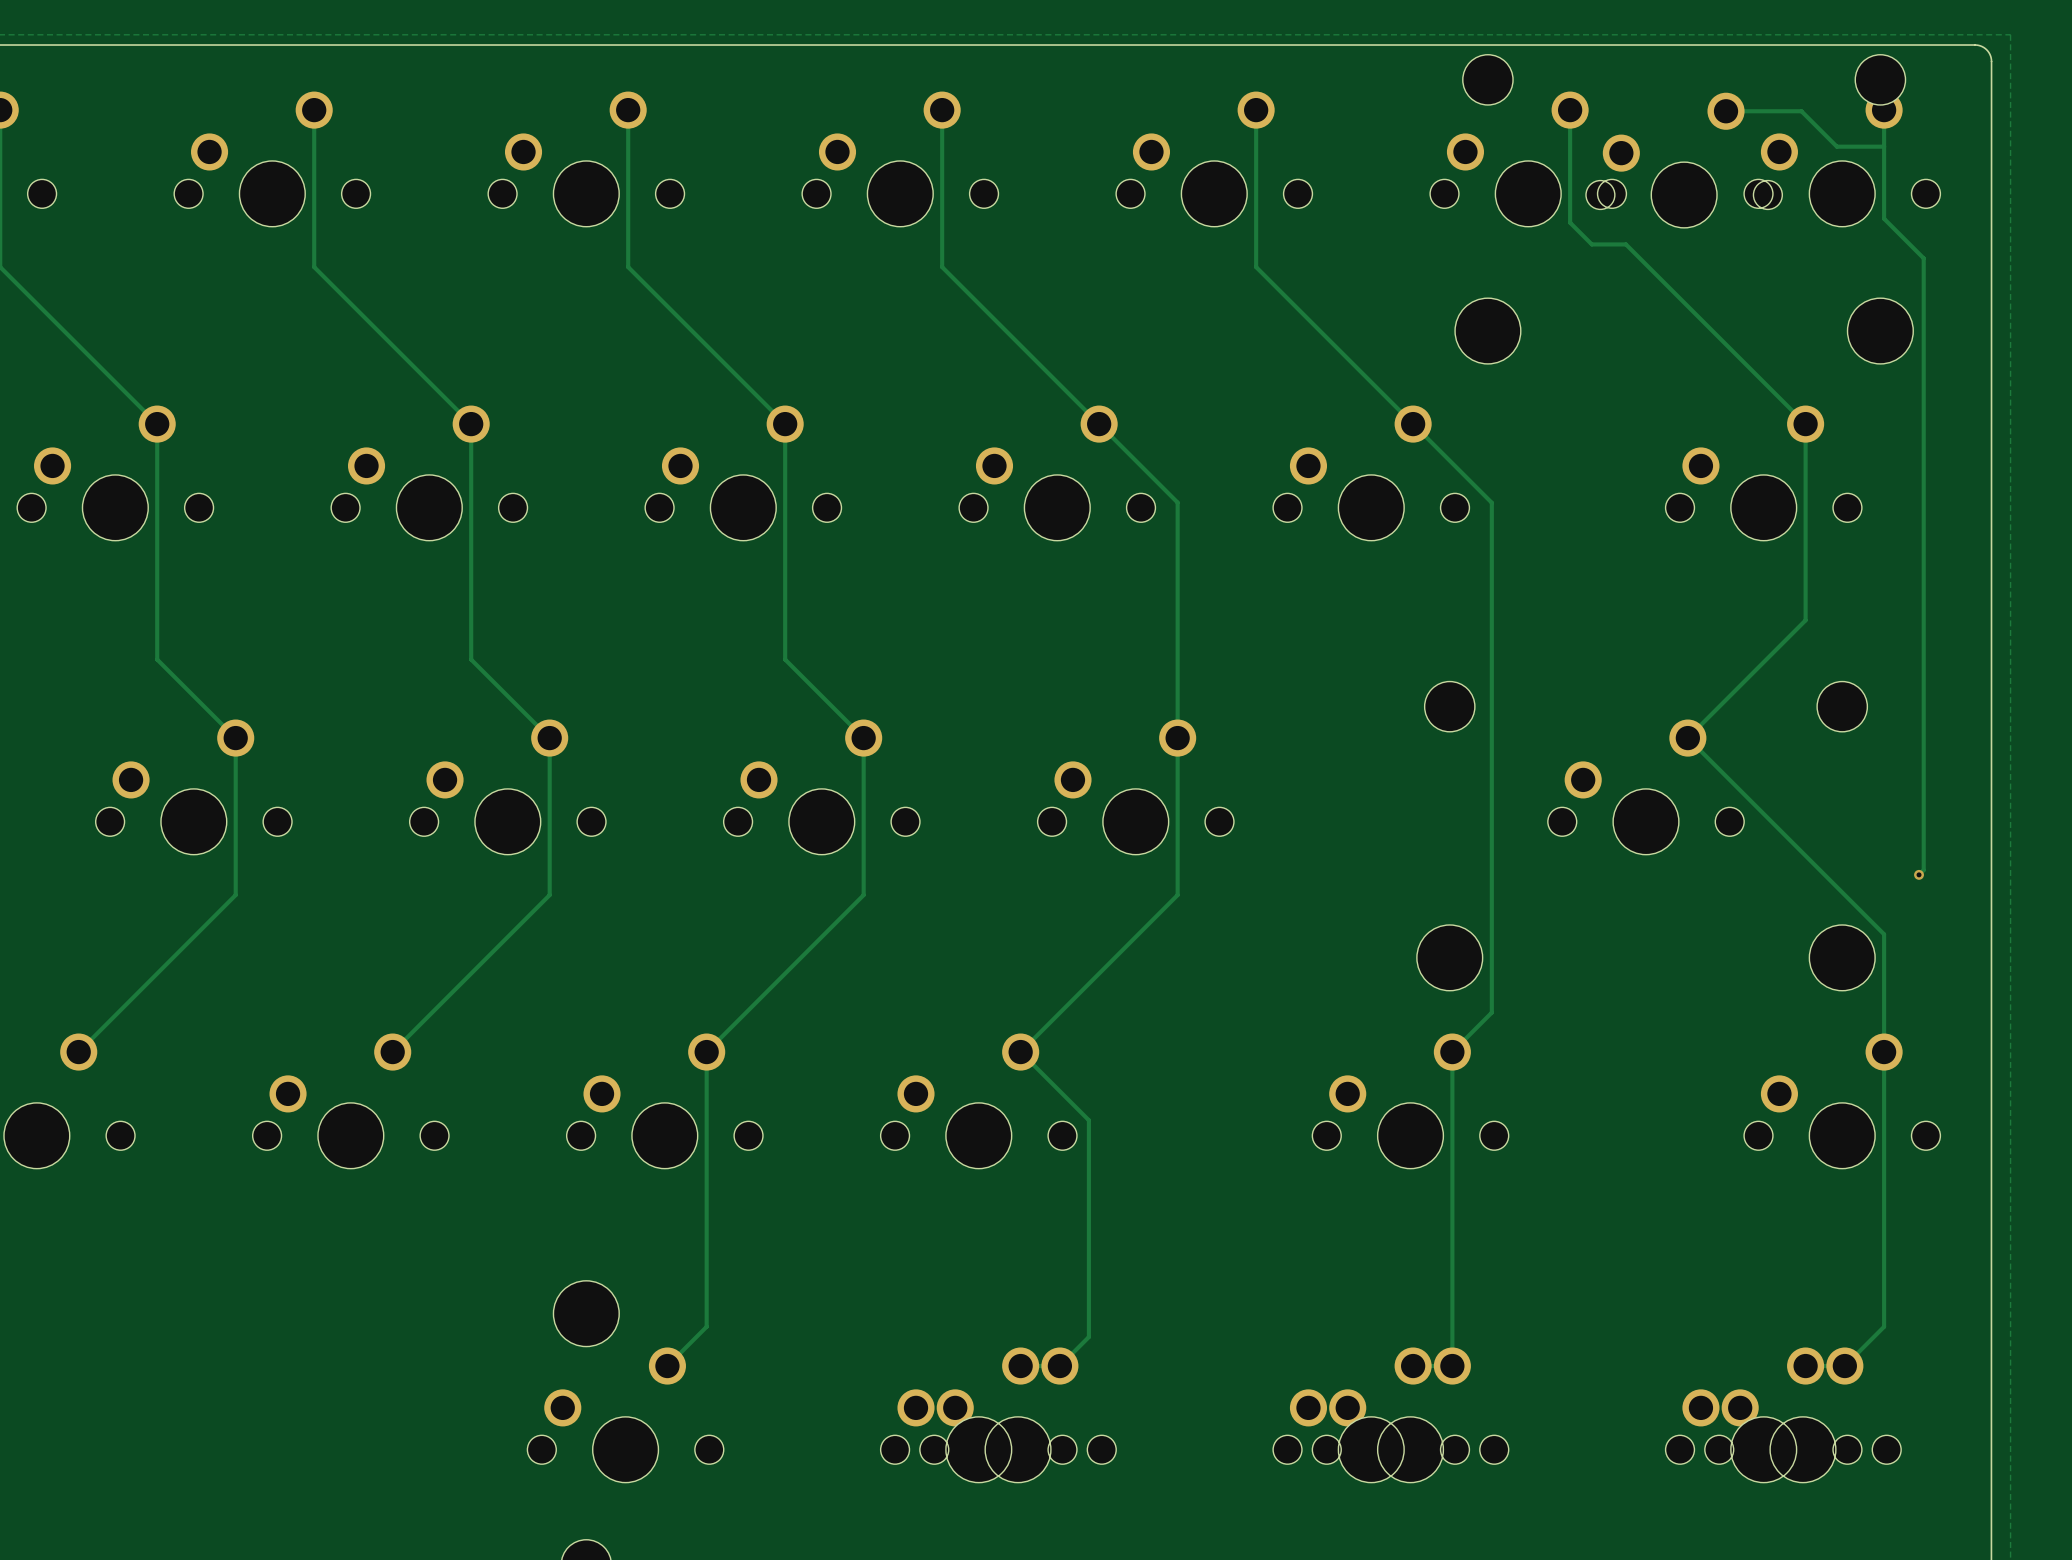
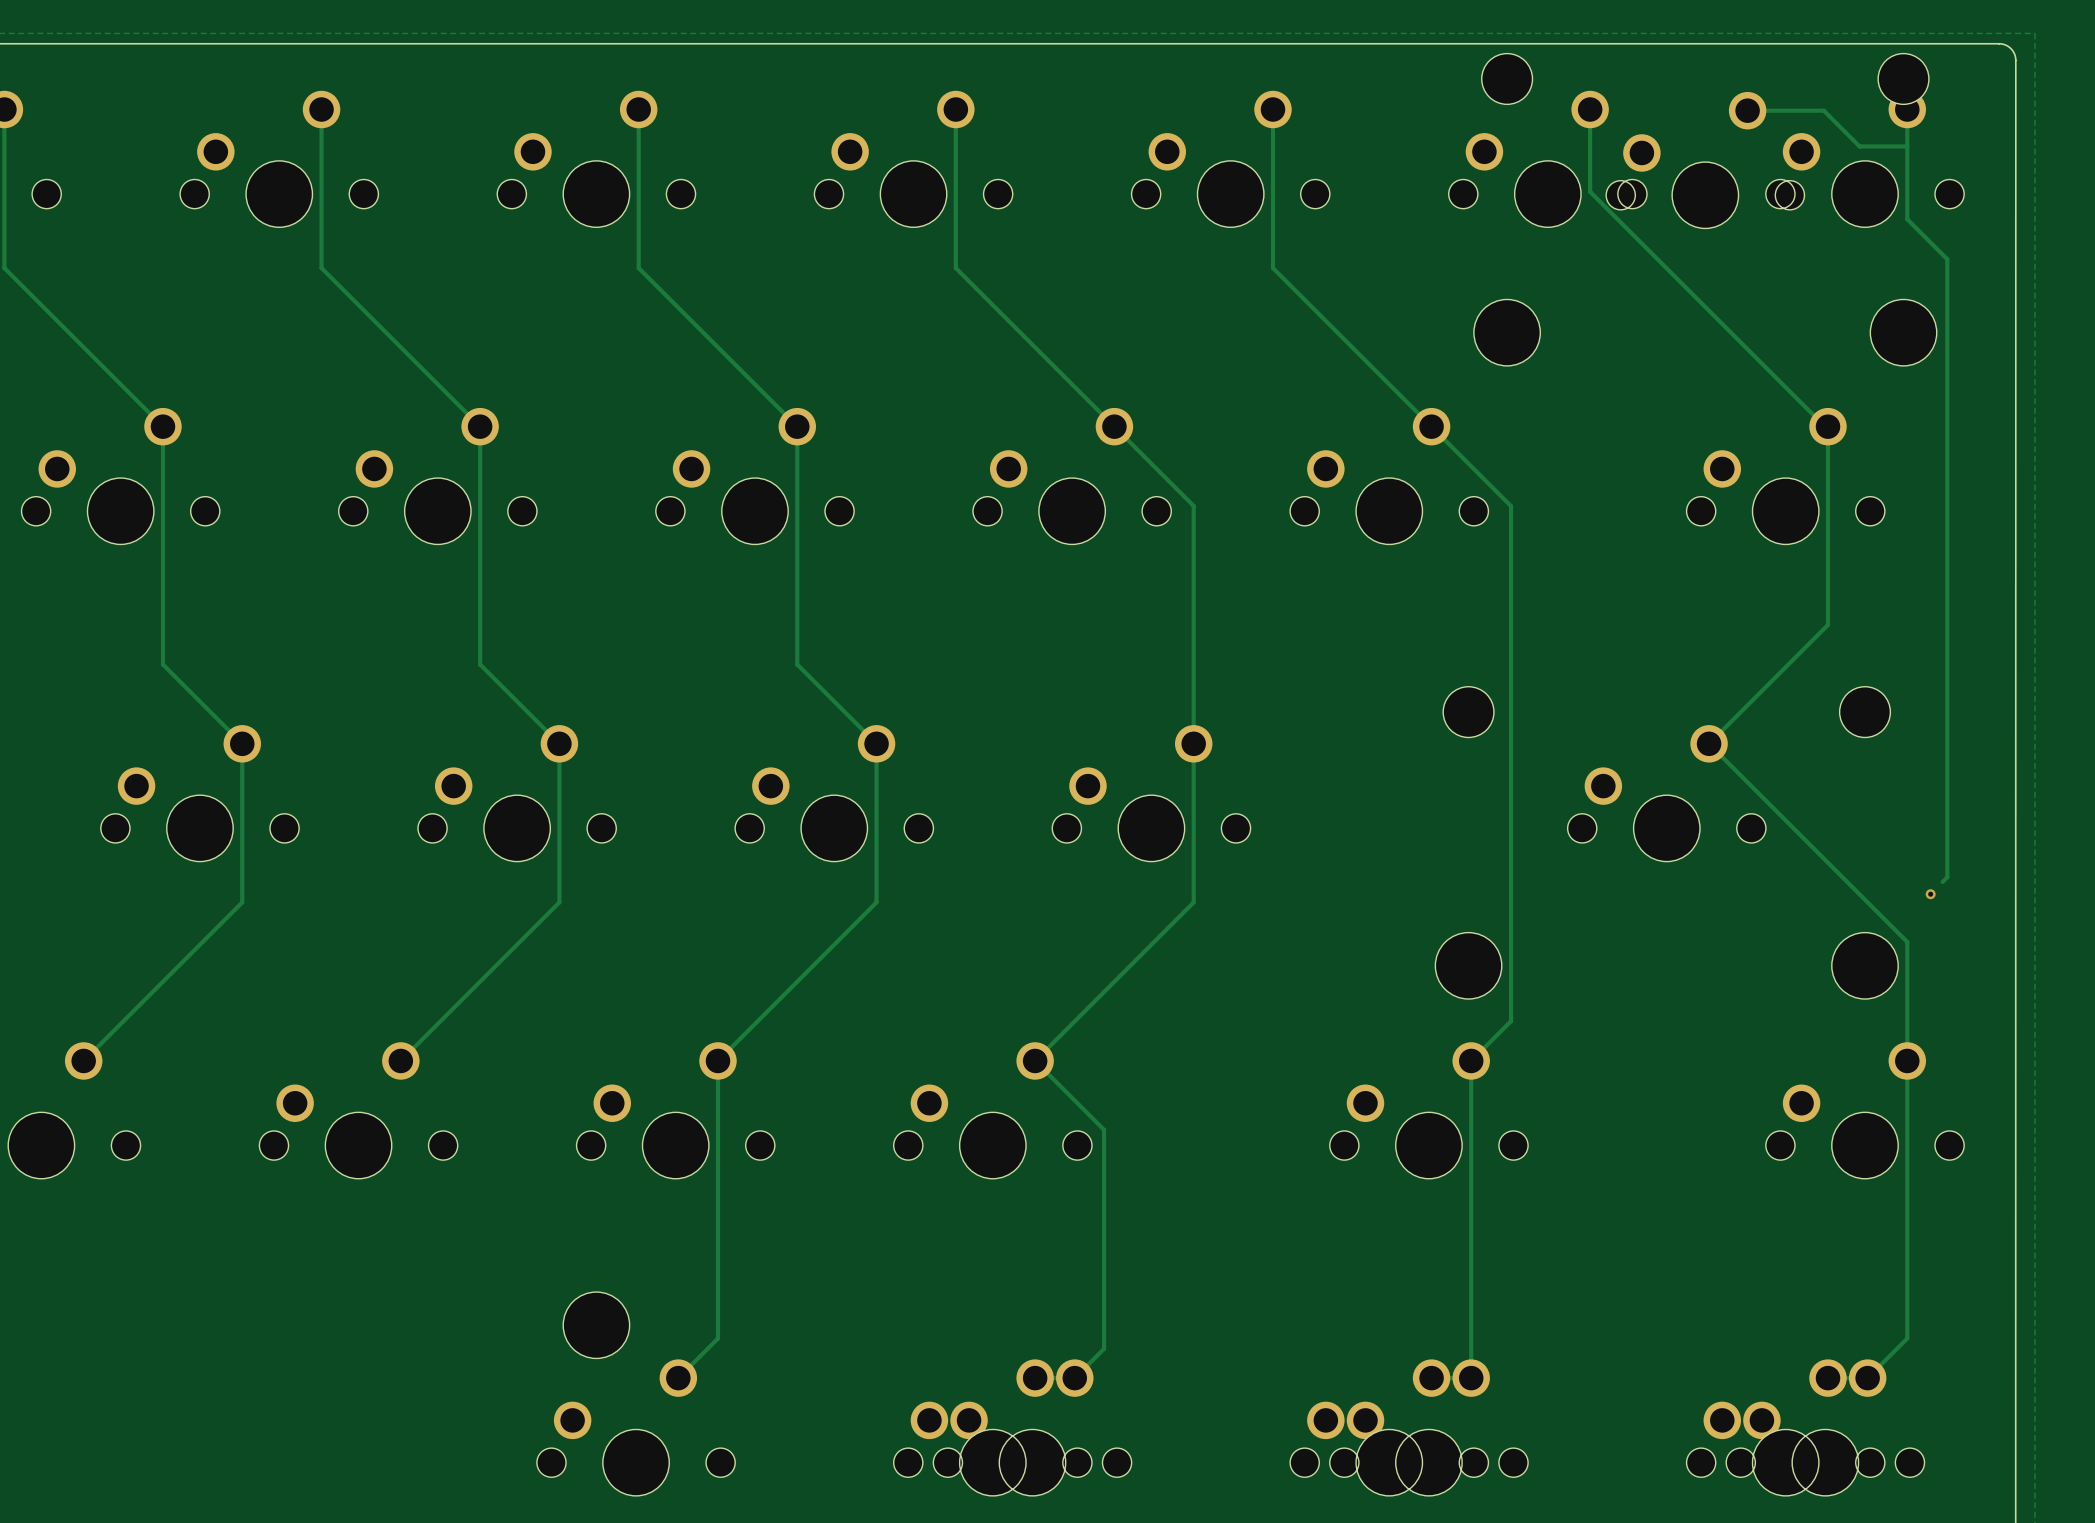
track: (1570, 191) (1570, 222) (1591, 244) (1625, 244) (1805, 424) -> (1590, 191) (1825, 426) (1828, 426)
via position: (1919, 874) -> (1930, 894)

